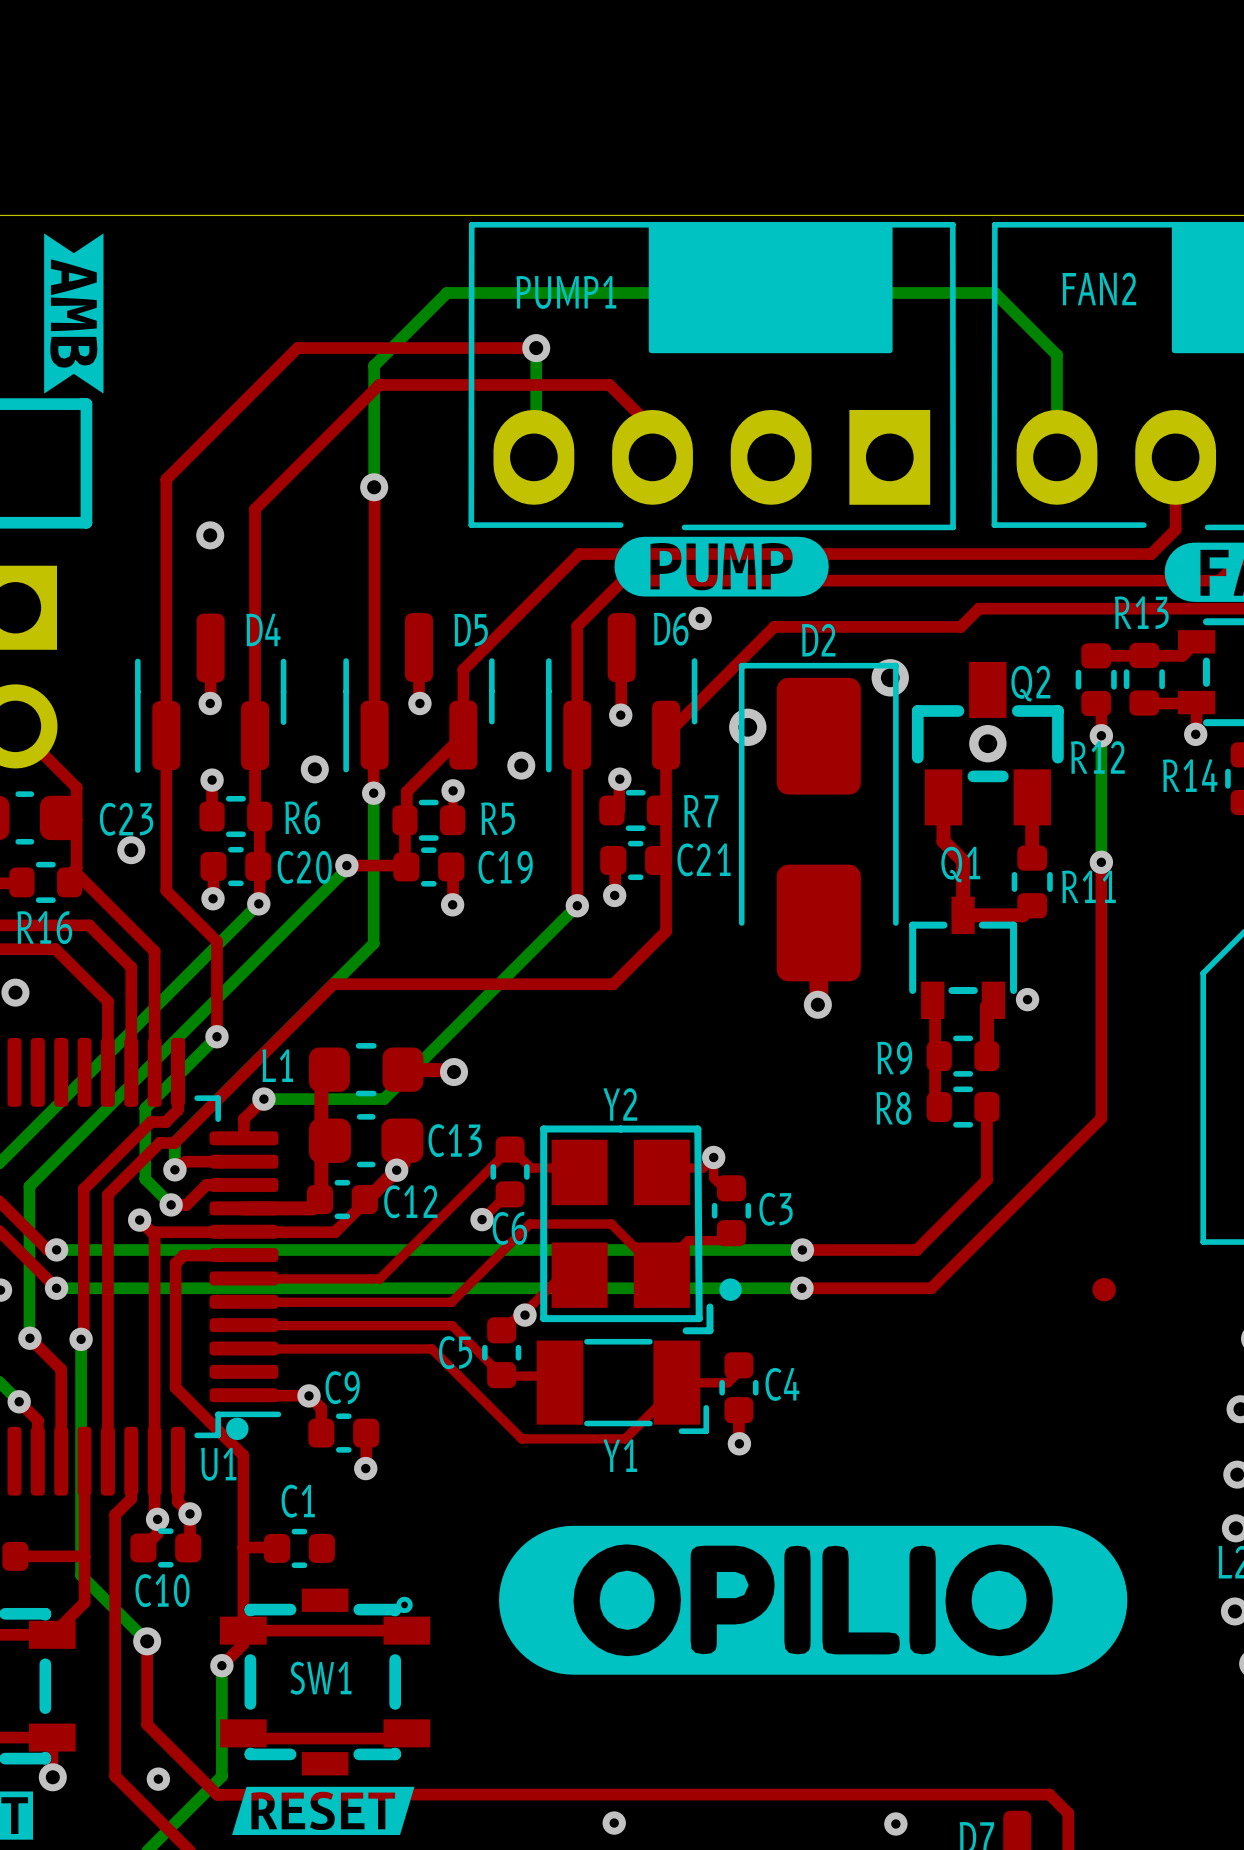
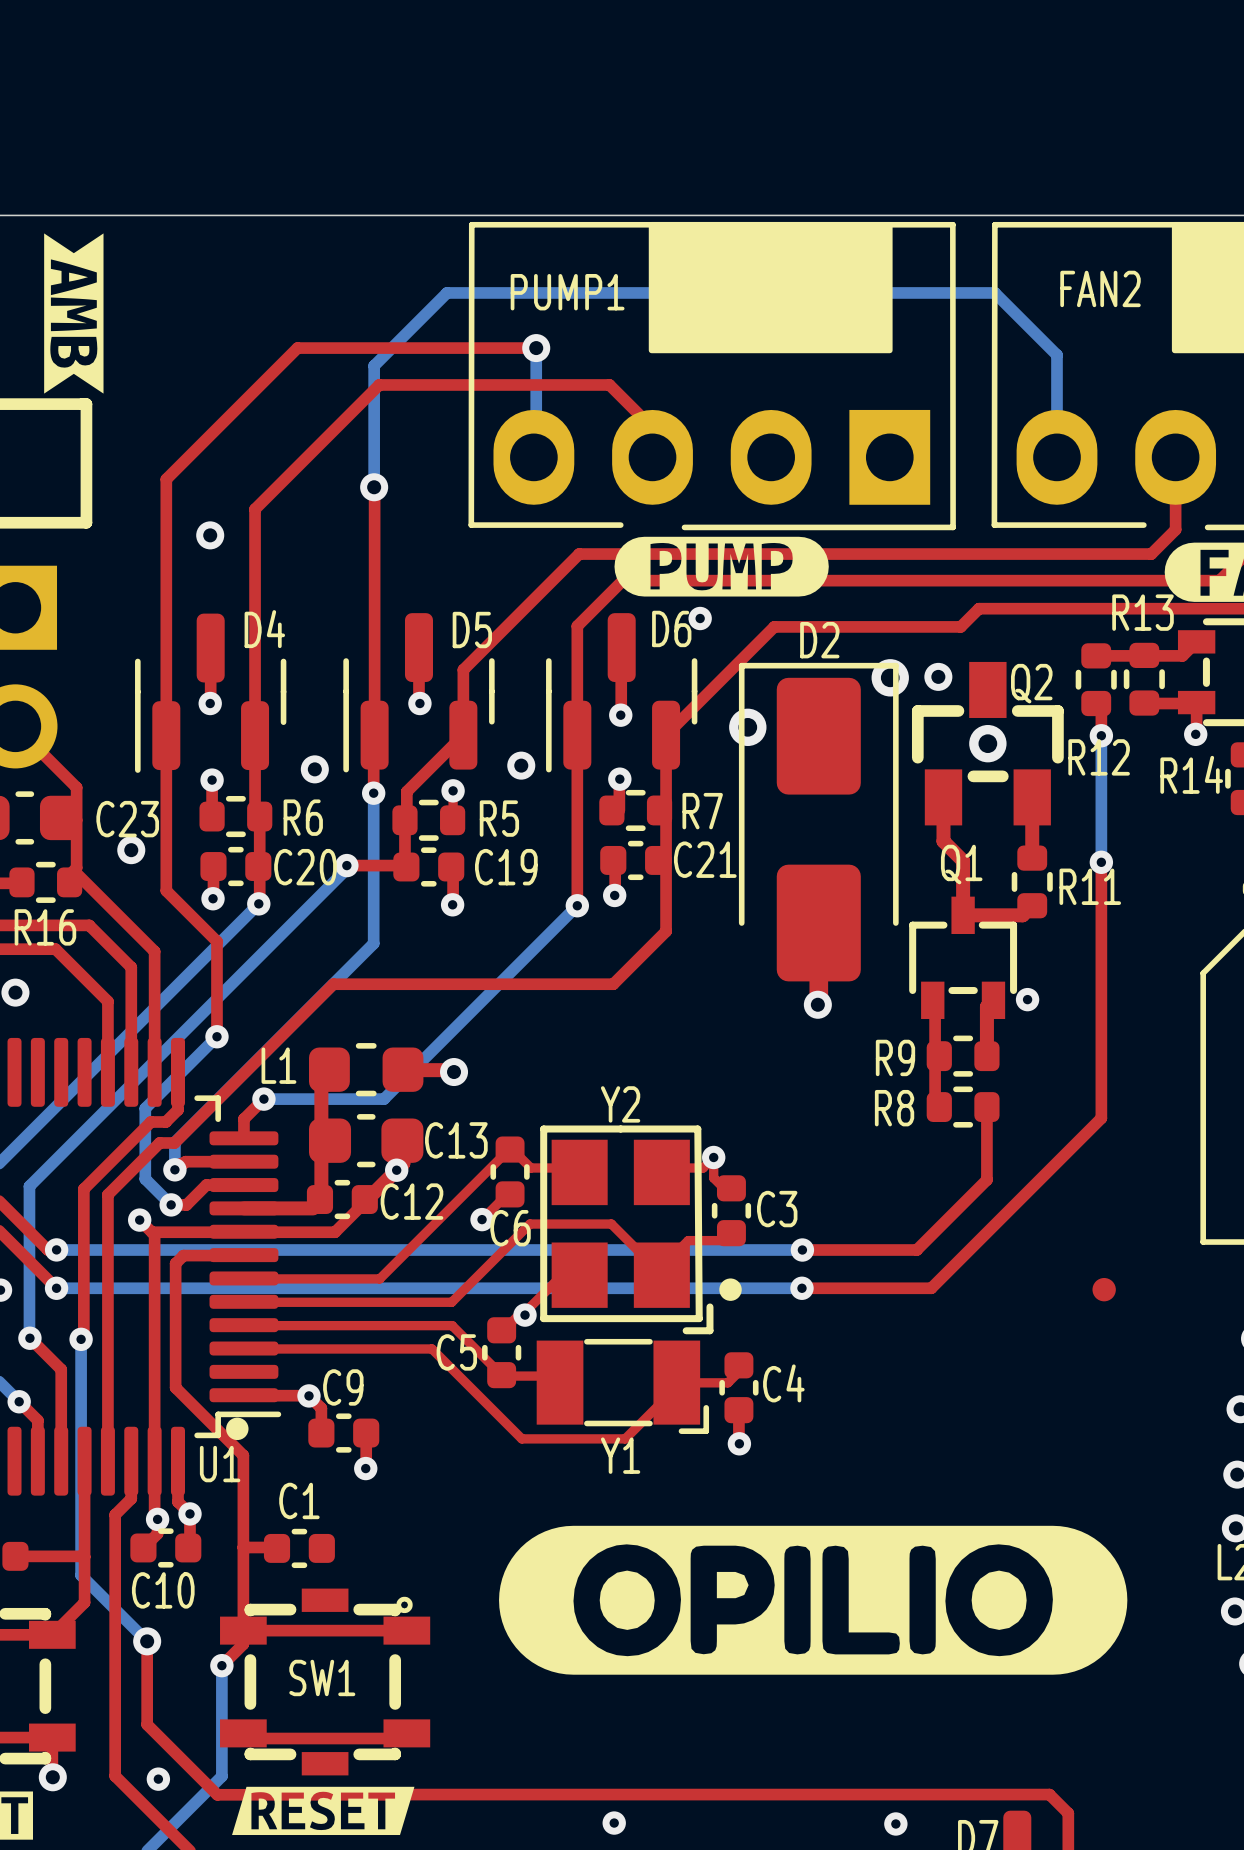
via: none -> (938, 676)

